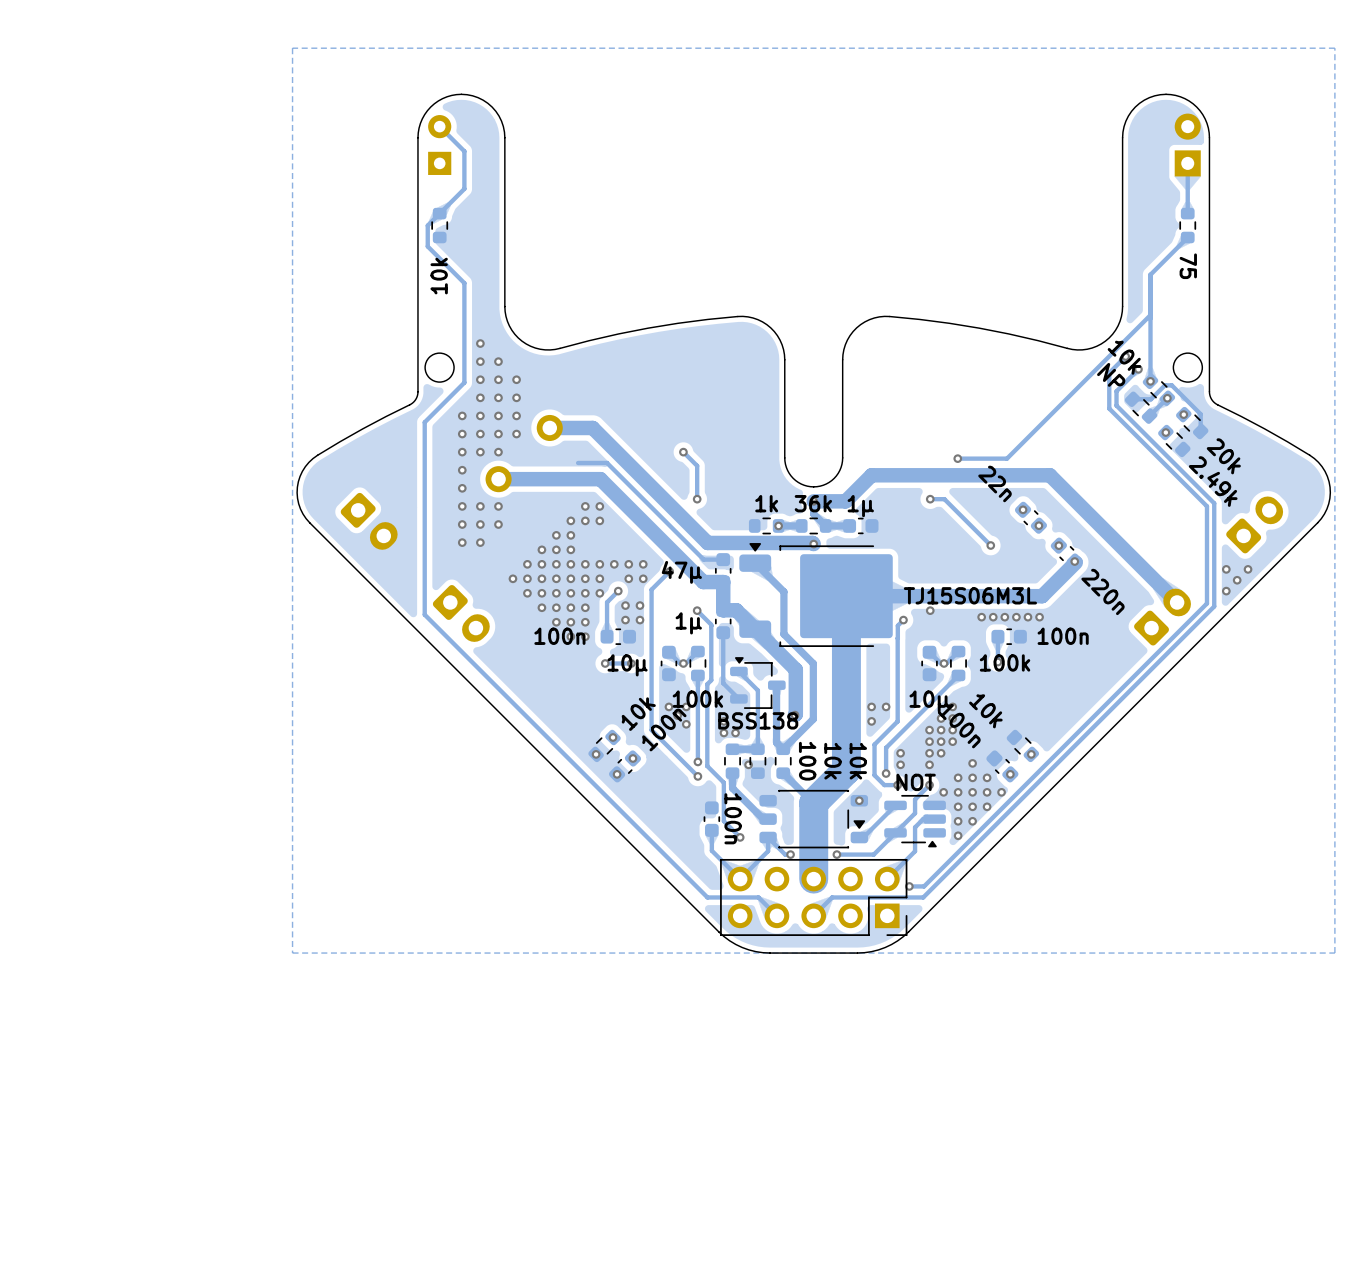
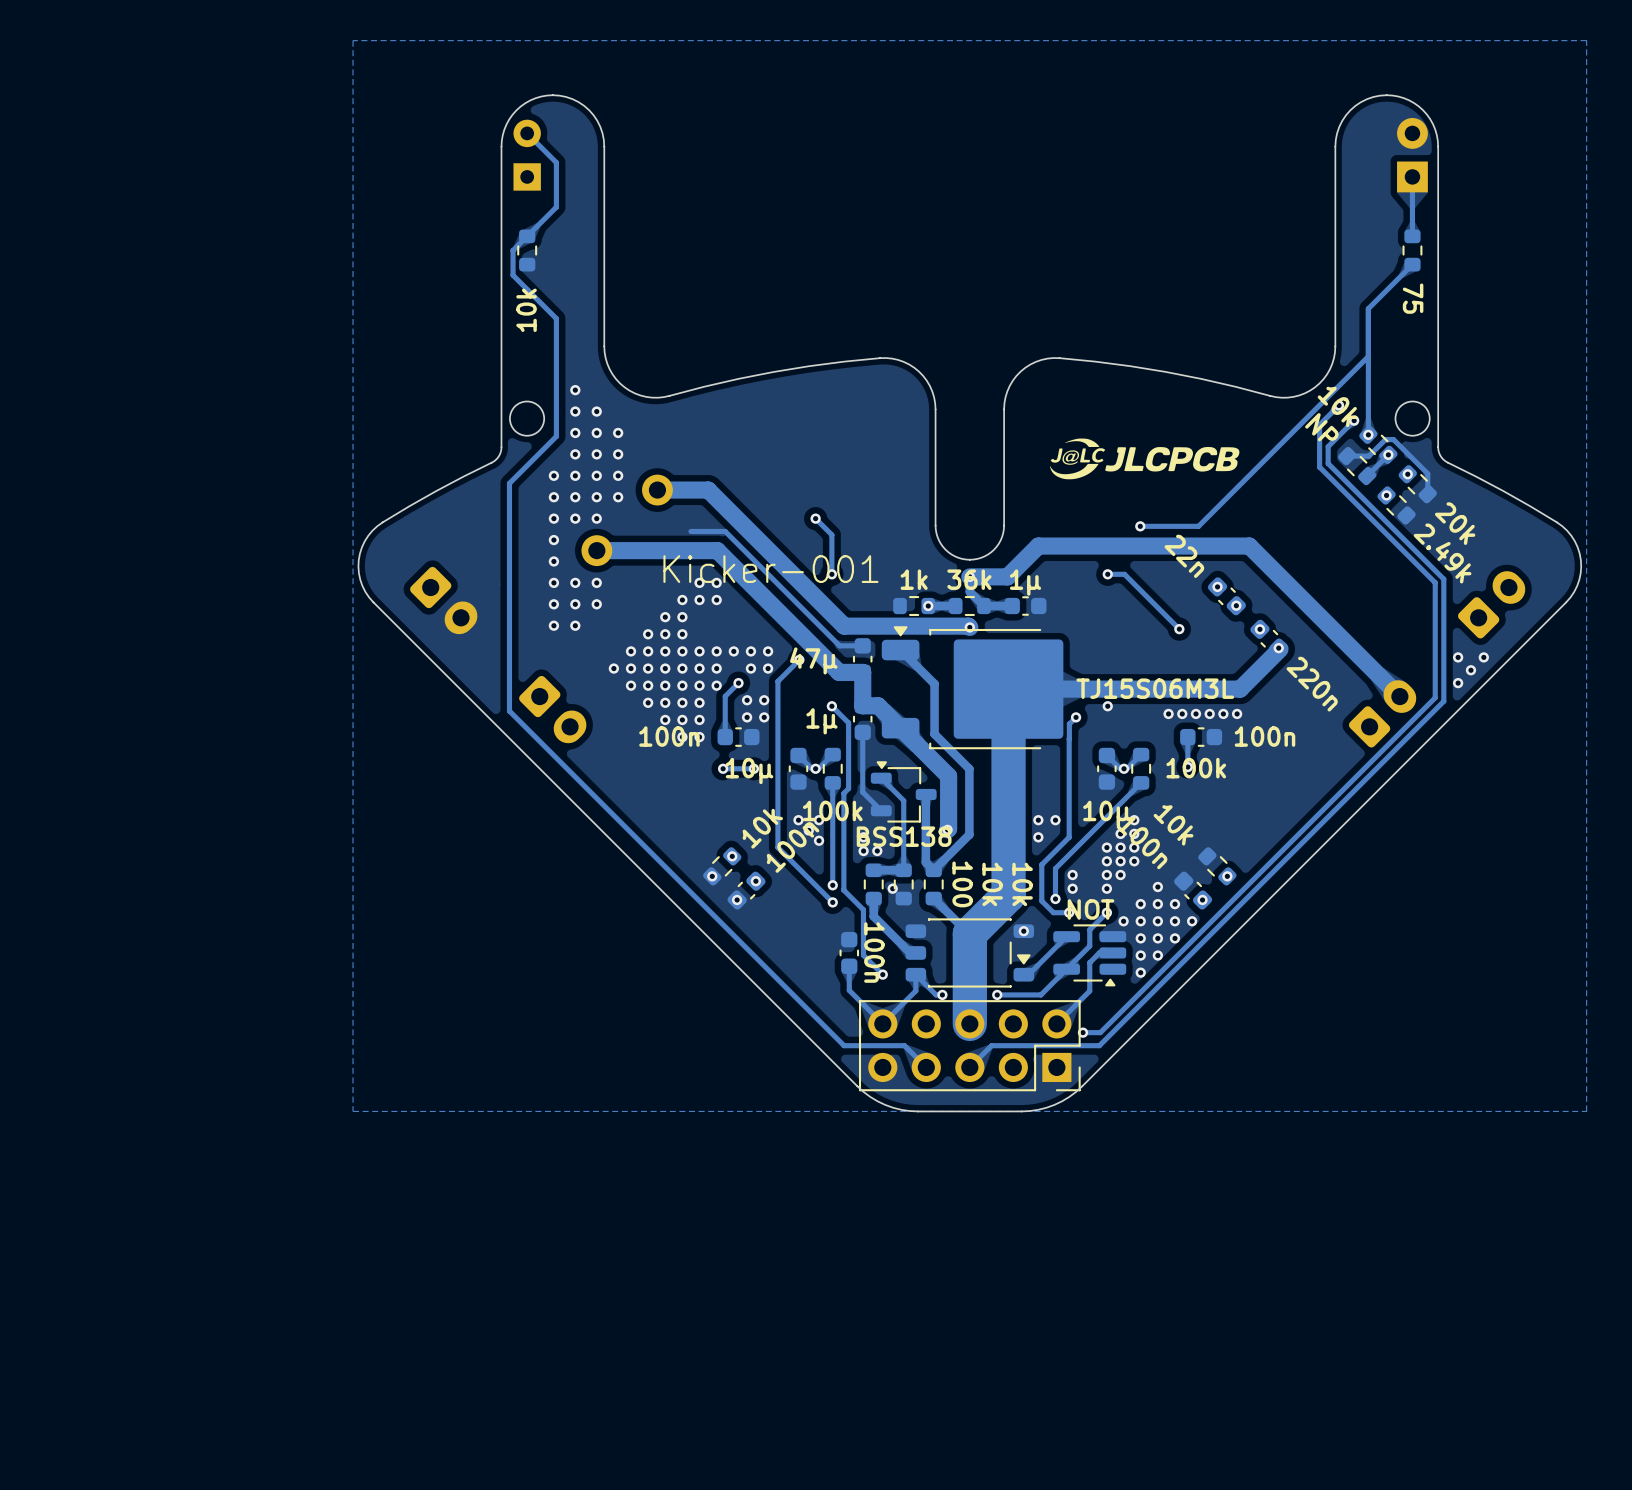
drawing: none -> [1049, 438, 1240, 480]
text: none -> Kicker-001 (770, 569)

